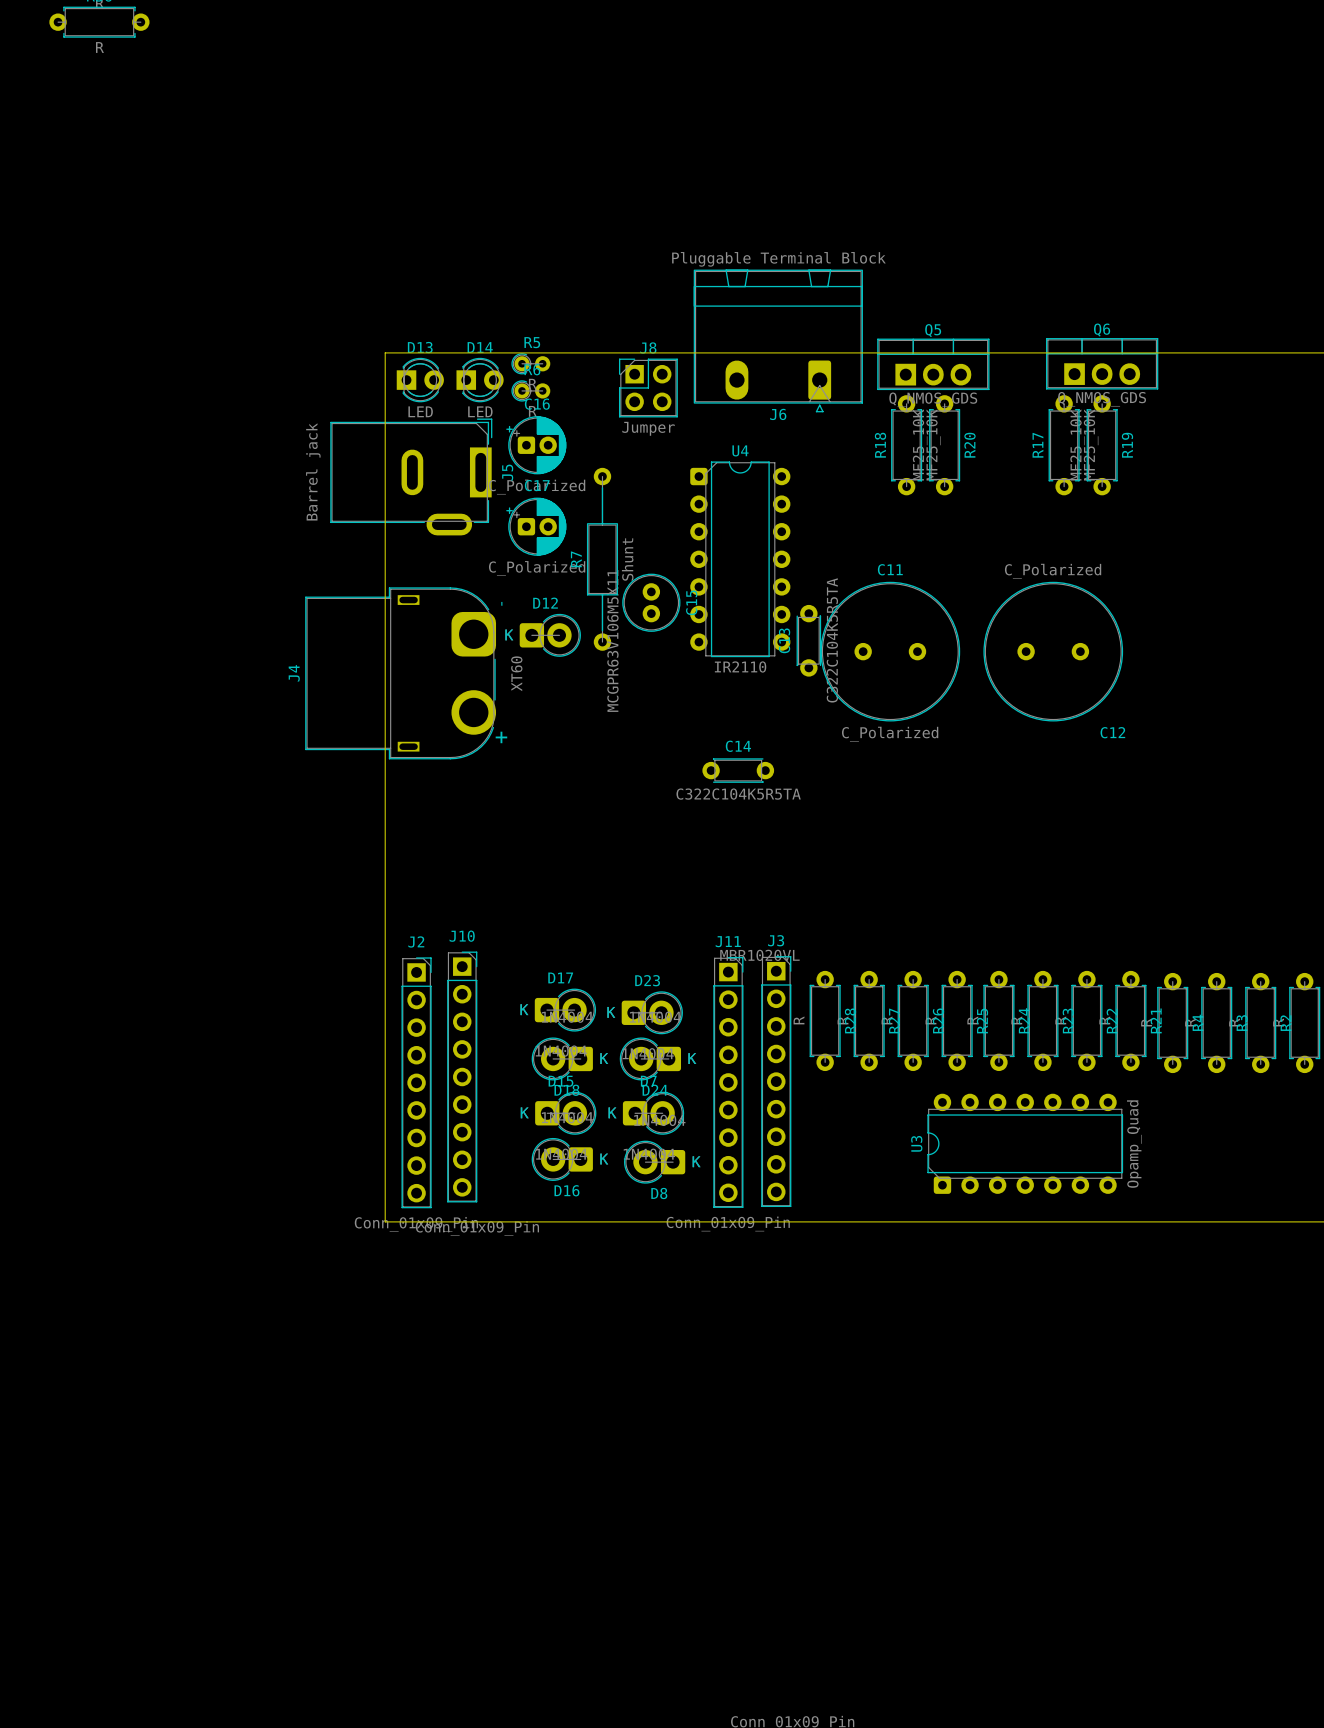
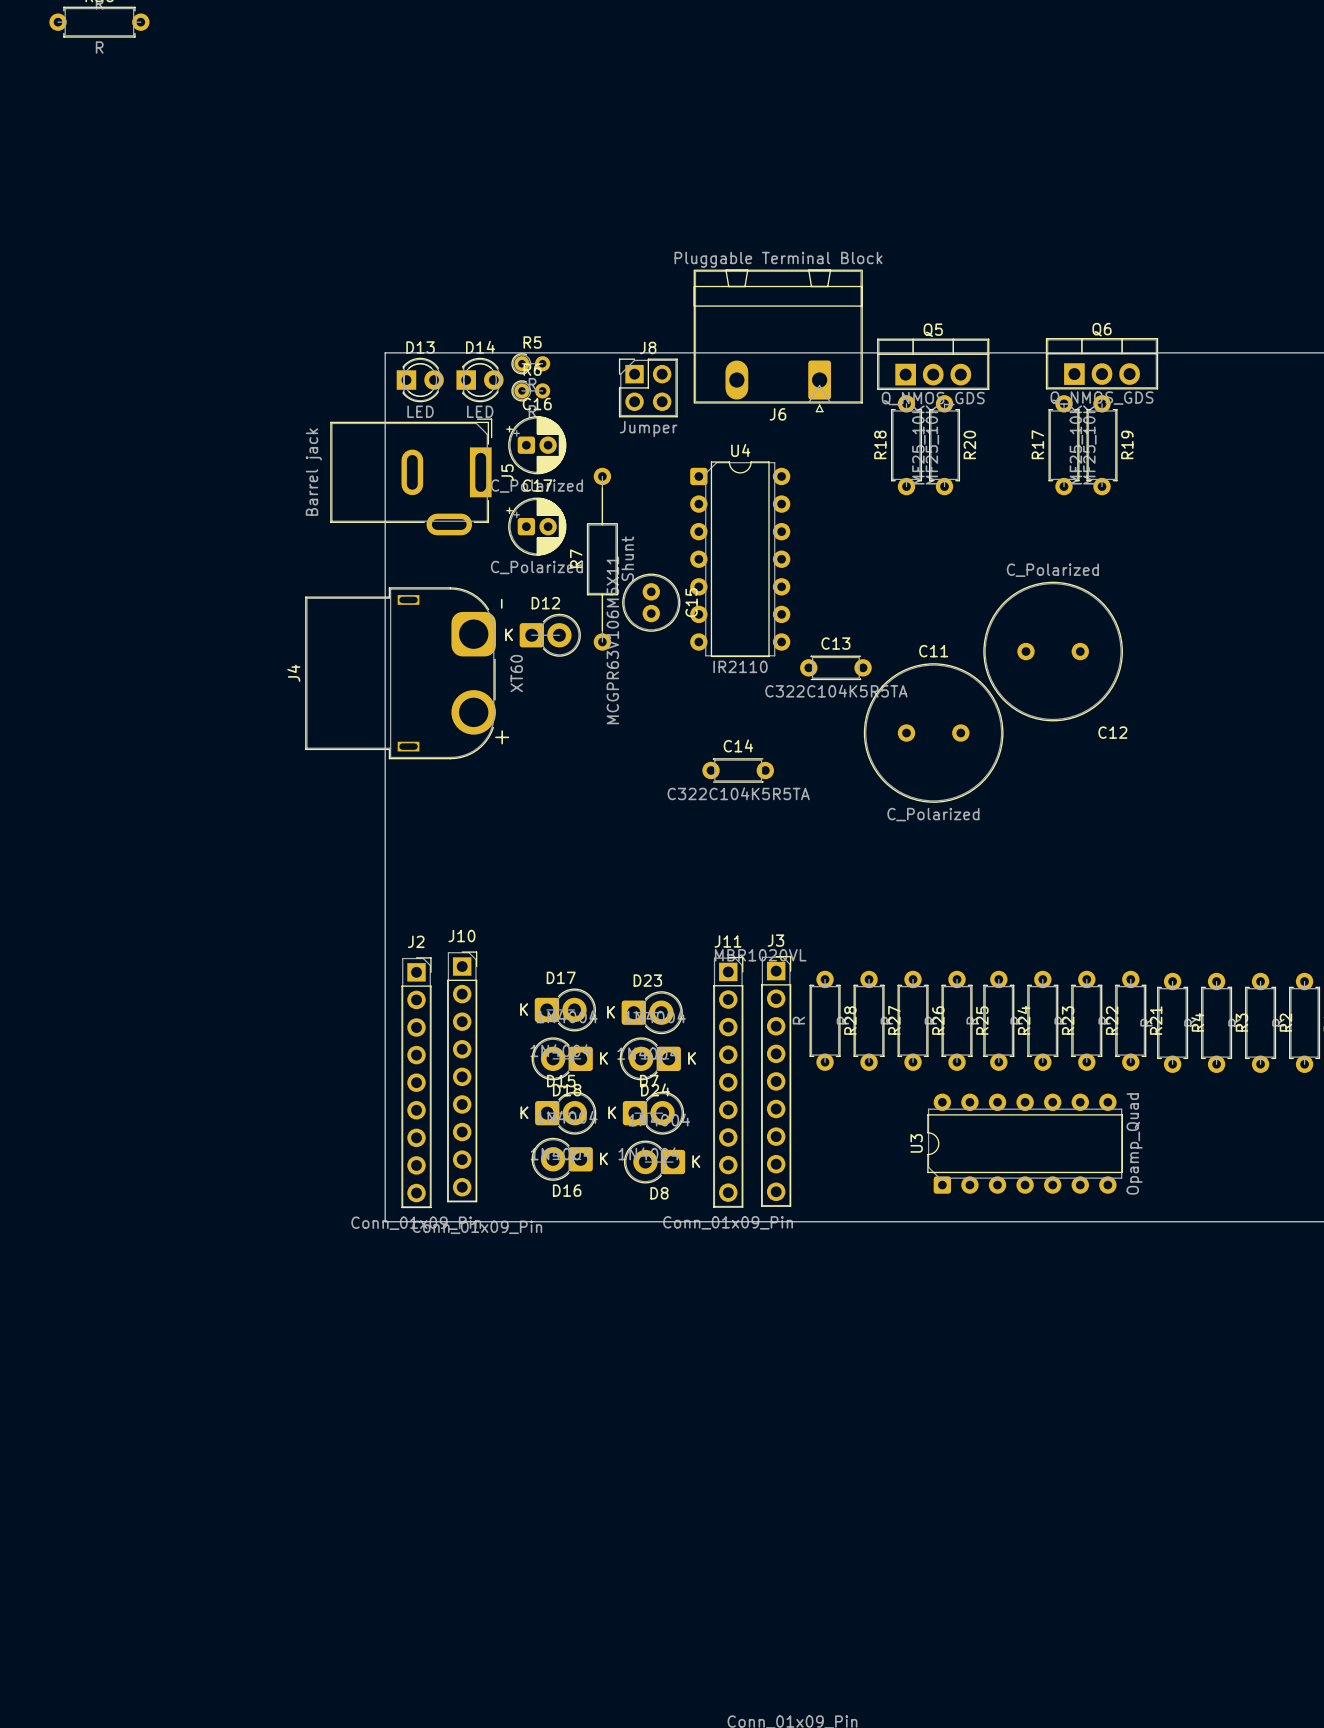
C13 rotation: 0° (808, 640) -> 90° clockwise (835, 667)
C11 position: (890, 651) -> (933, 733)

